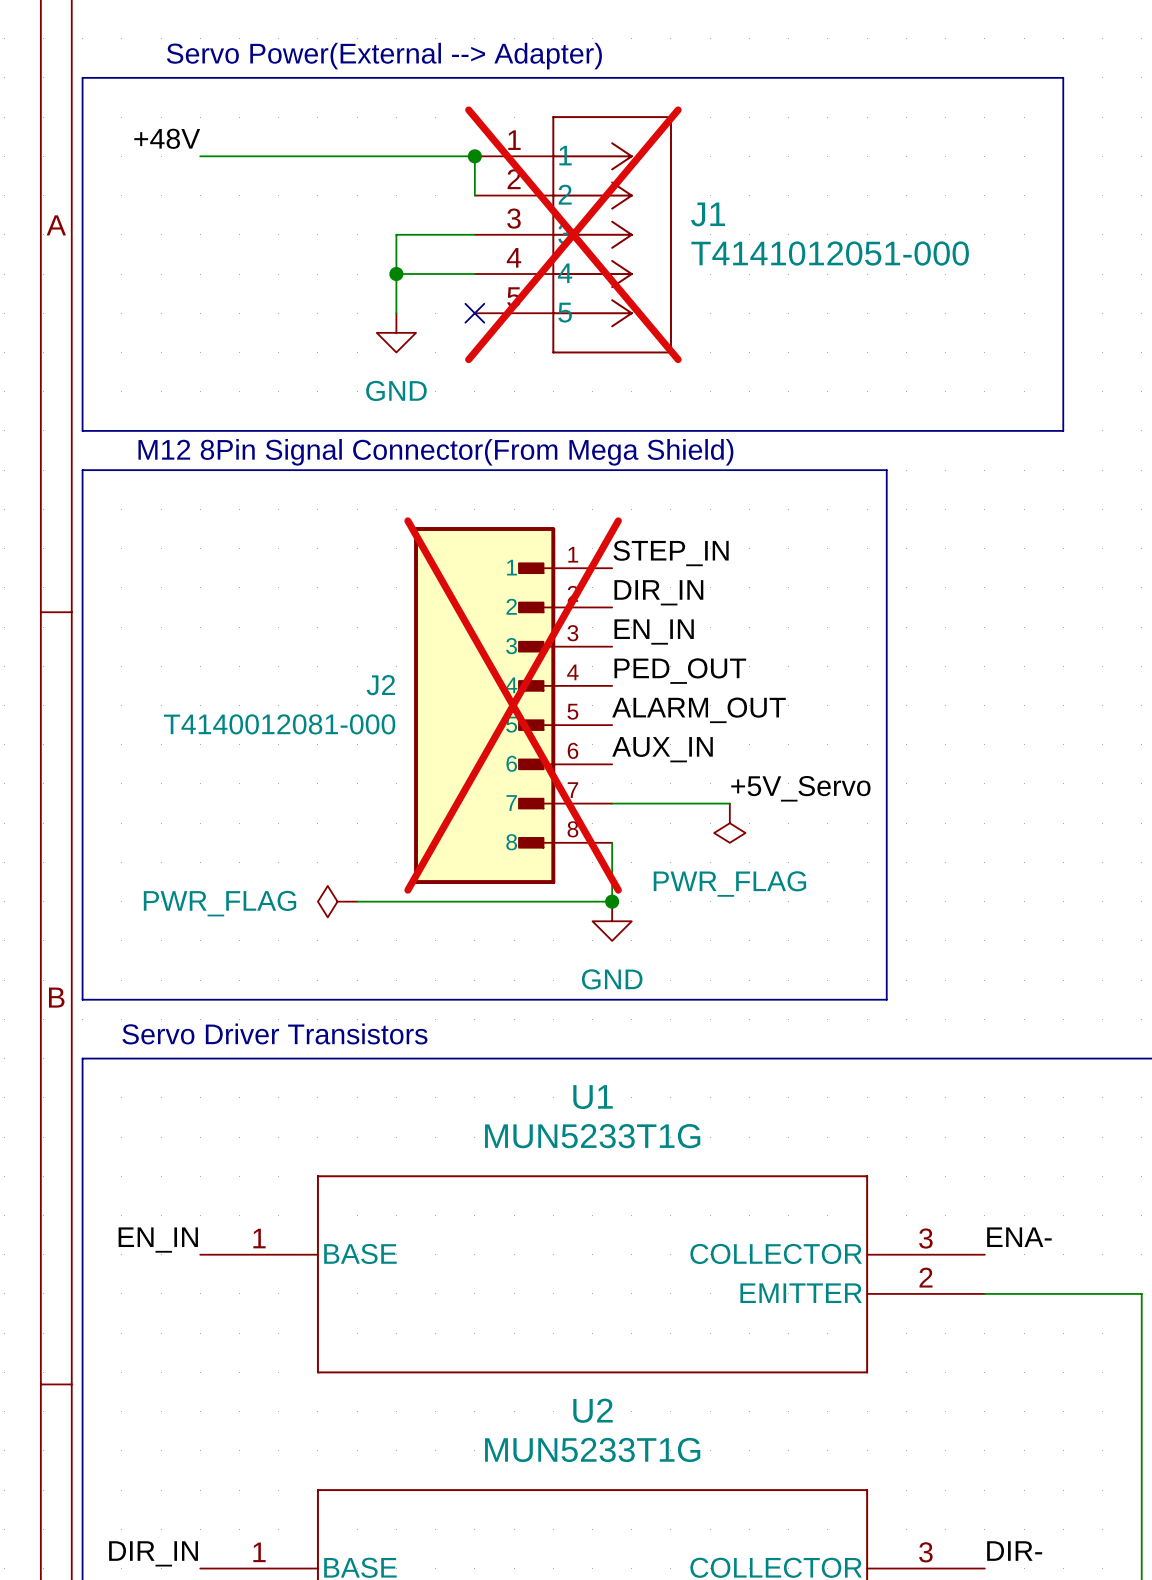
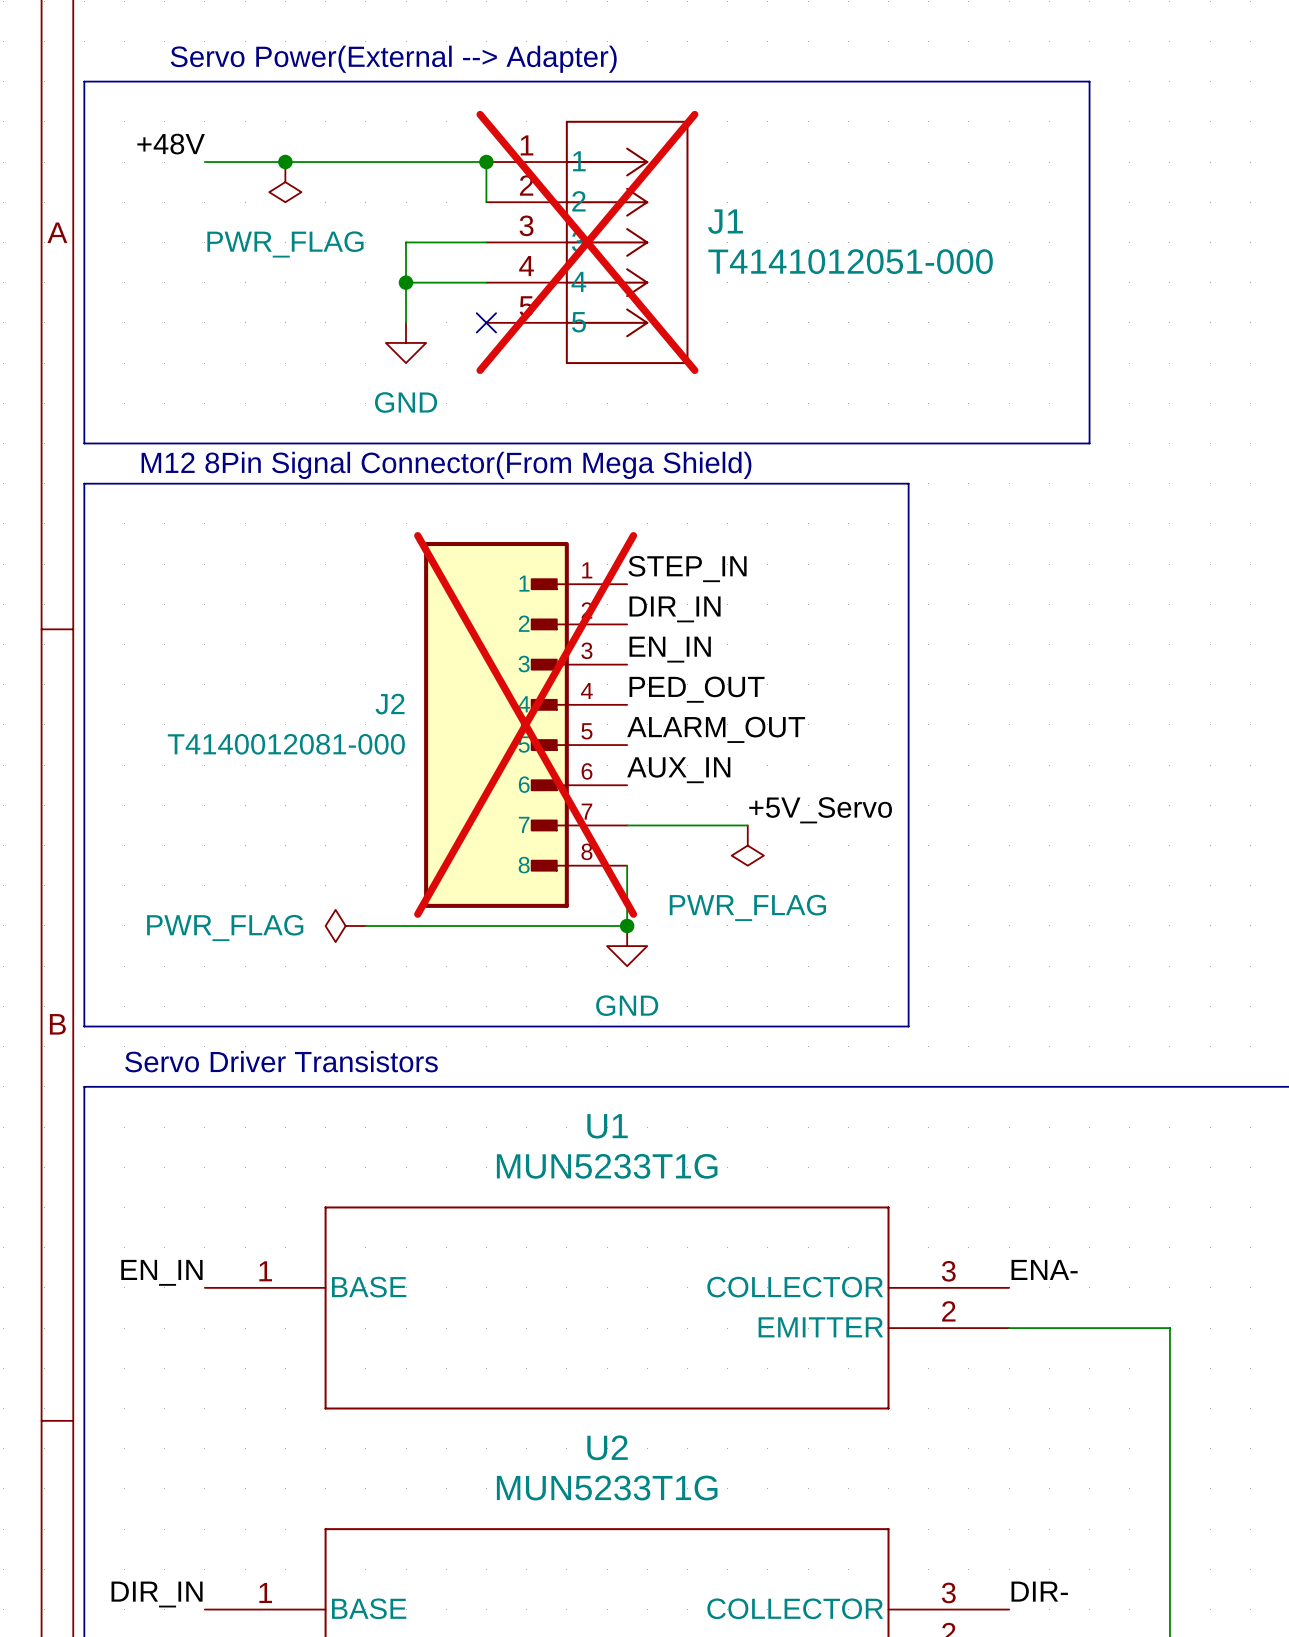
junction: none -> (285, 162)
power symbol: none -> PWR_FLAG (285, 182)

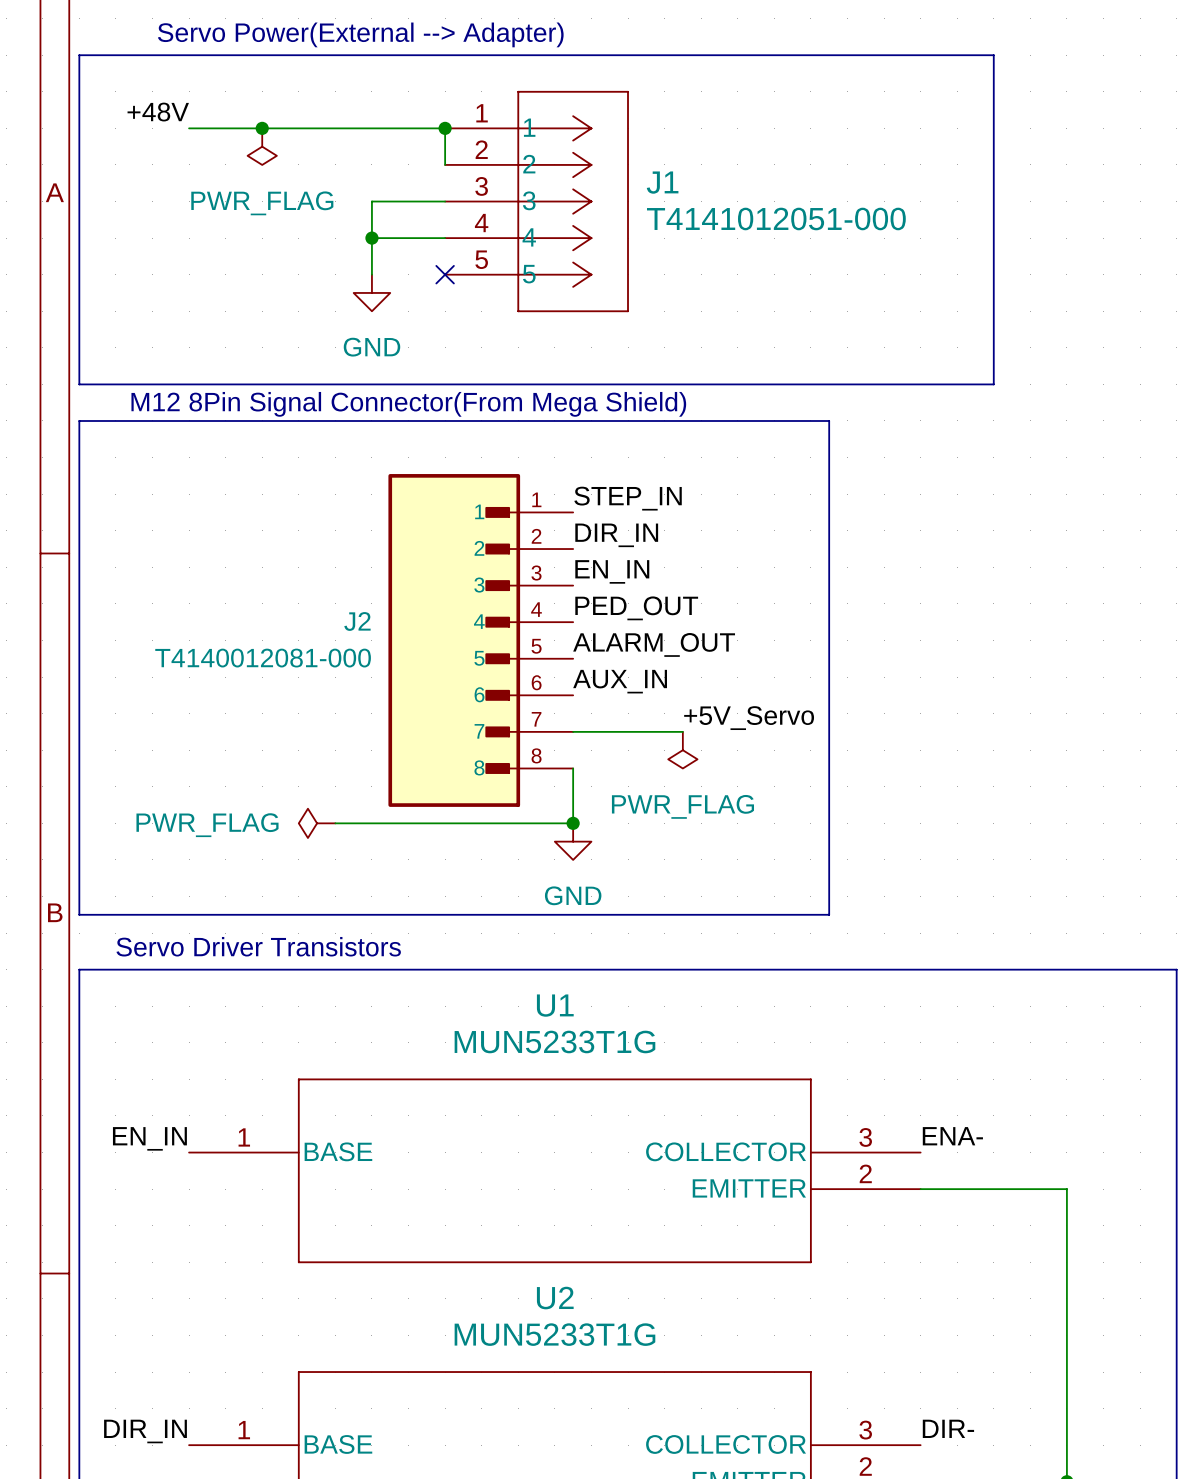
J1 do-not-place cross: (587, 242) -> none
J2 do-not-place cross: (525, 724) -> none

